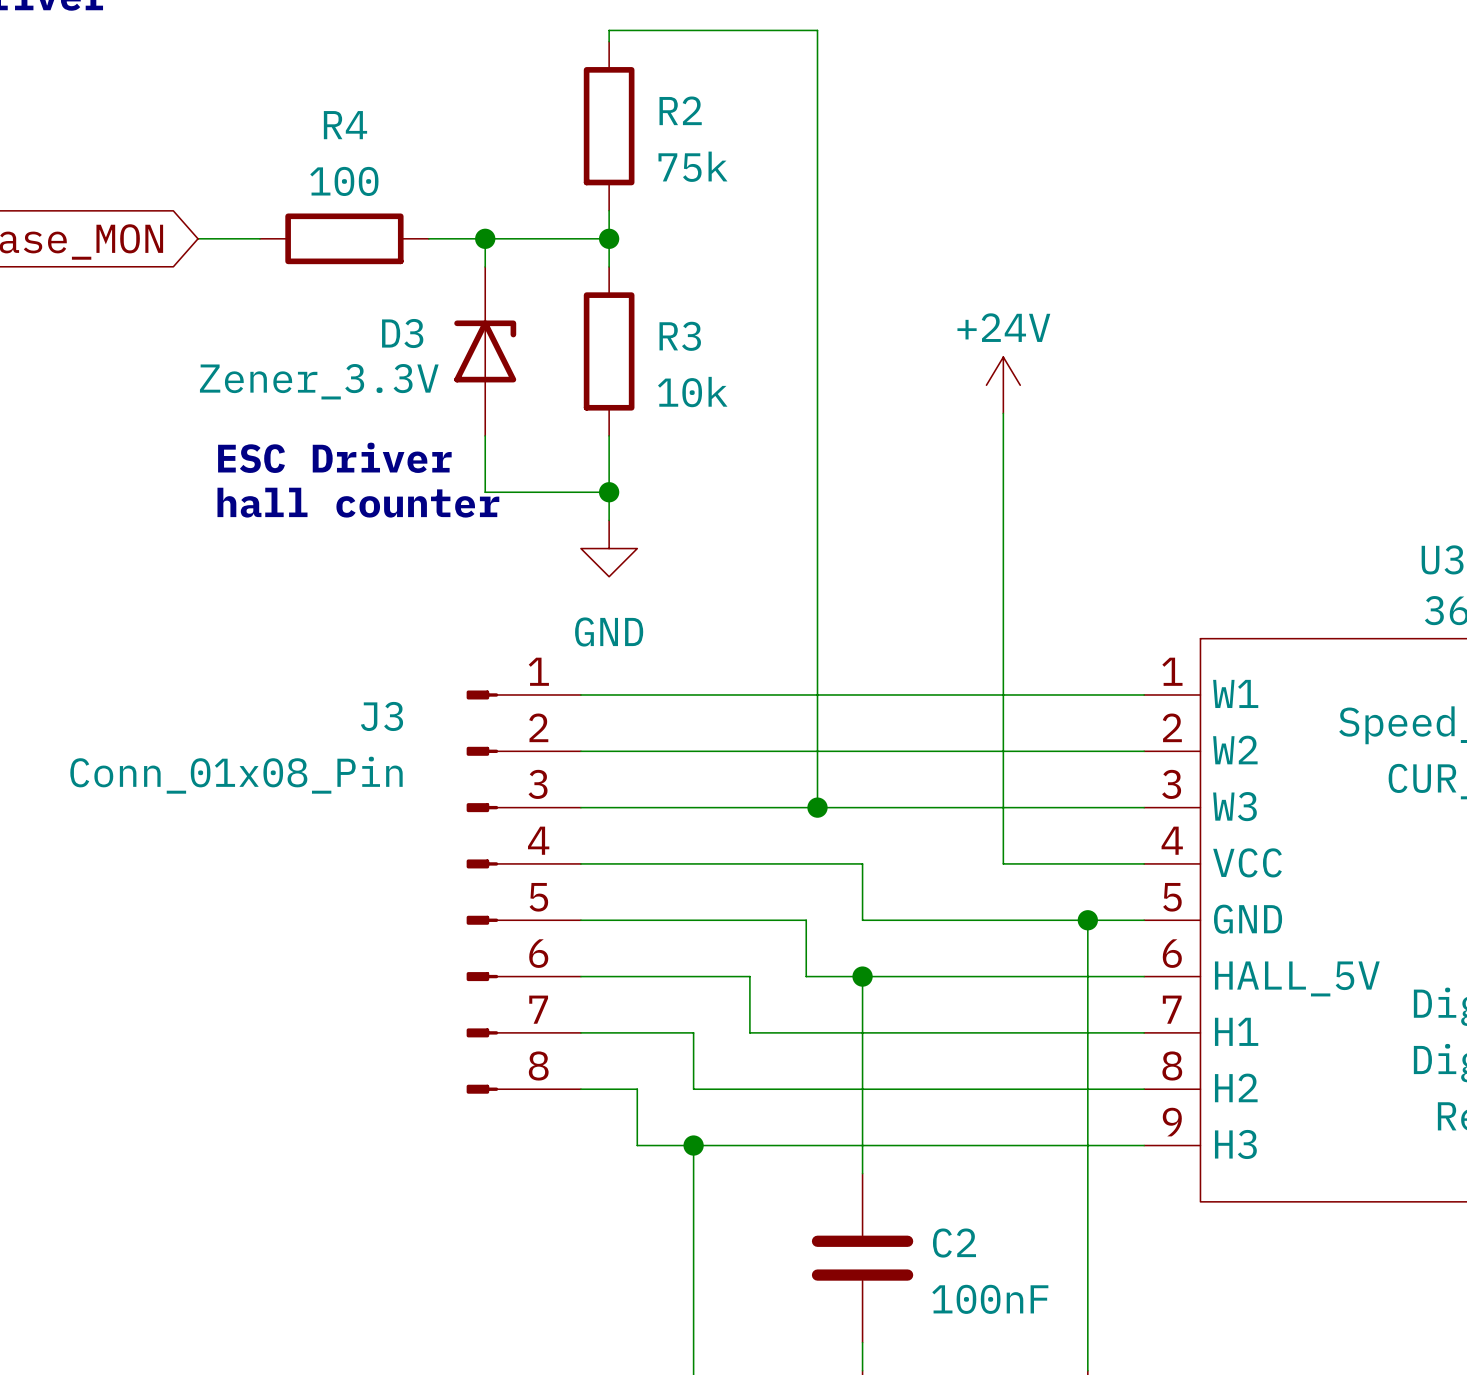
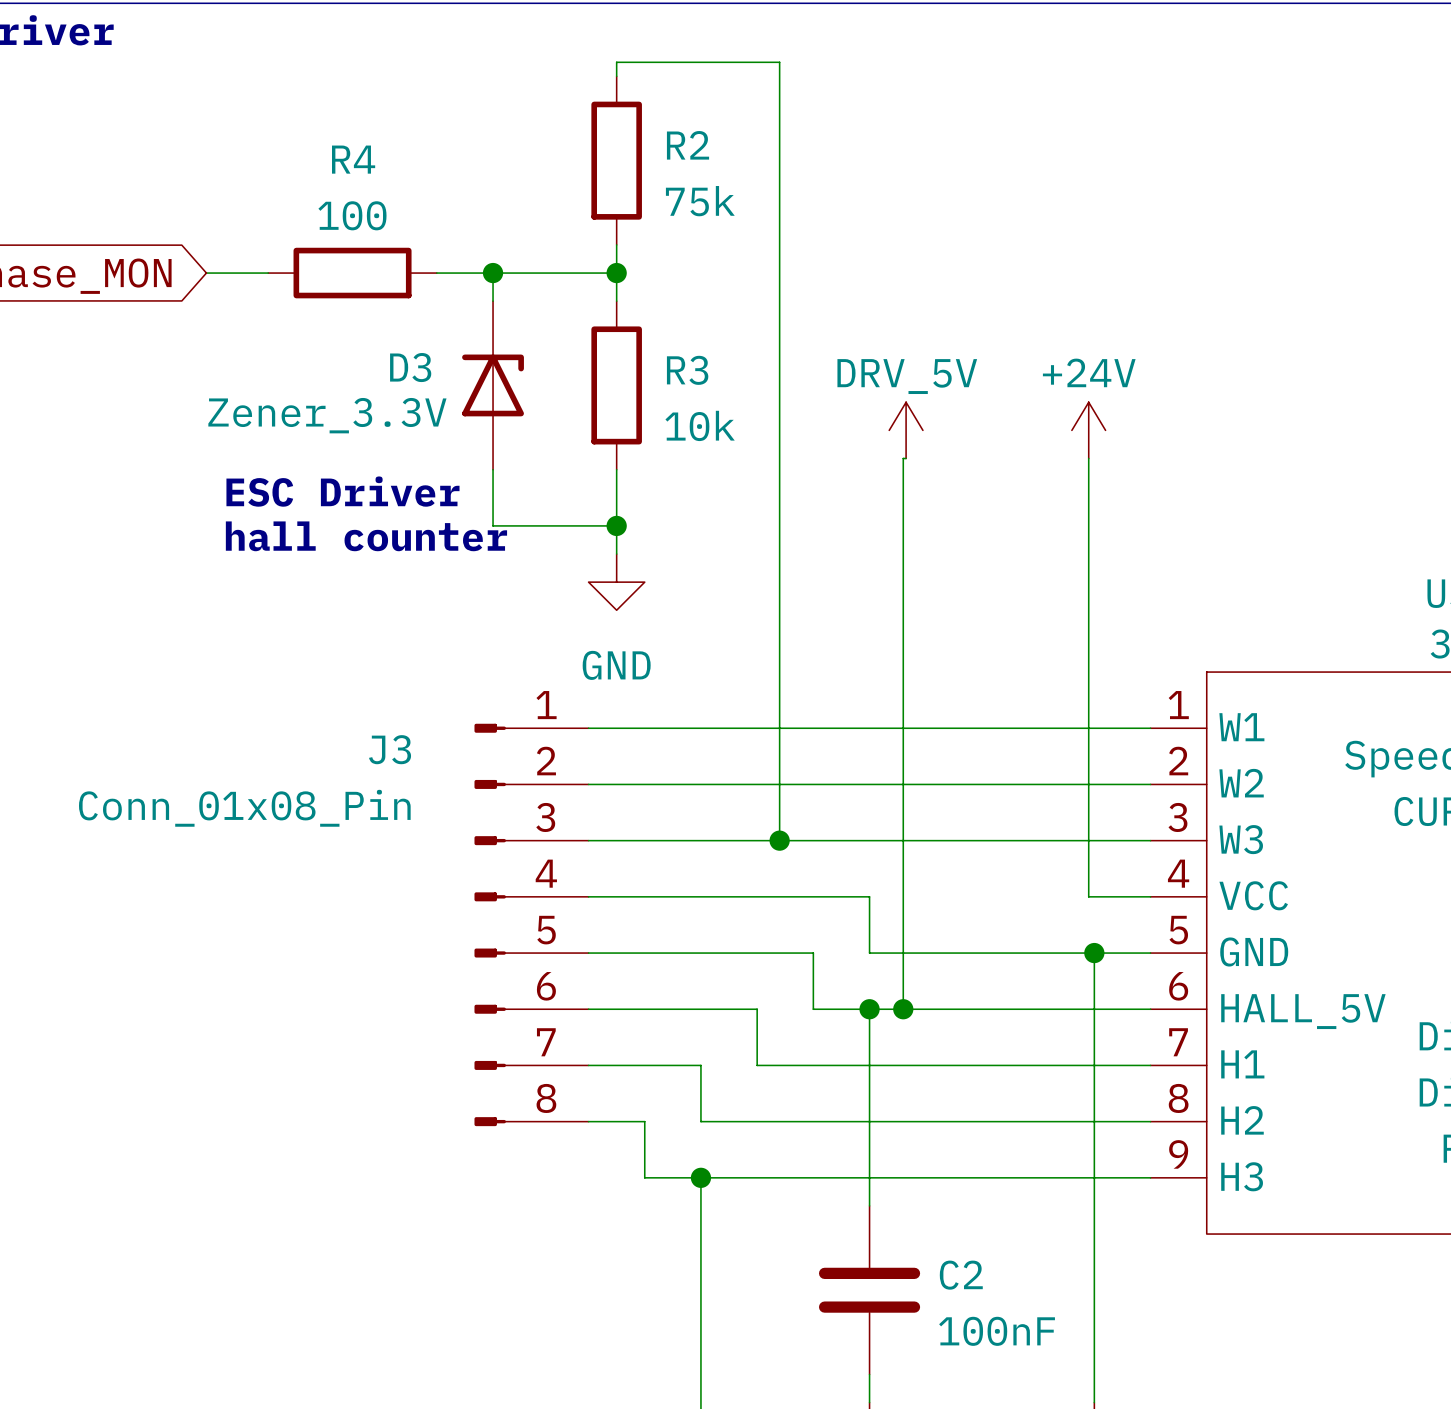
wire: (609, 30) (817, 30) (817, 807) -> (616, 65) (616, 62) (779, 62) (779, 840)
power symbol position: +24V (1003, 385) -> +24V (1088, 430)
power symbol: none -> DRV_5V (906, 430)
wire: (1003, 413) (1003, 863) (1082, 863) -> (1088, 458) (1088, 896)
wire: none -> (906, 458) (903, 458) (903, 1009)
junction position: (817, 807) -> (779, 840)
junction: none -> (903, 1009)

